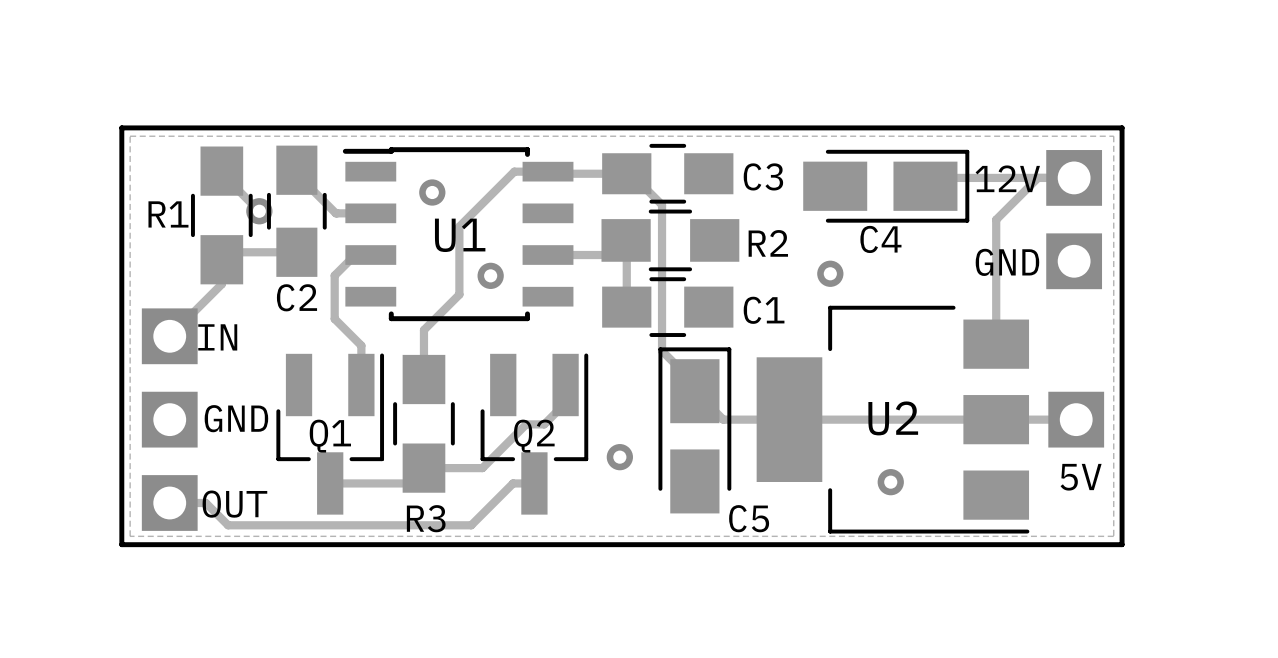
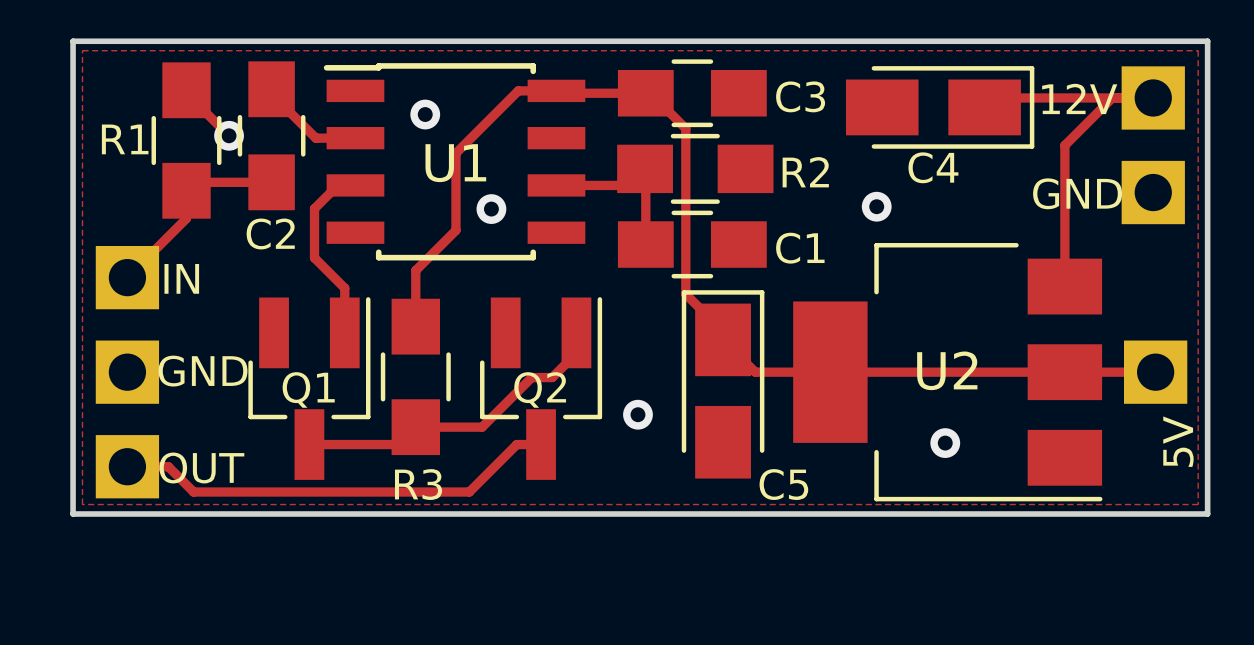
text rotation: 0° (1081, 477) -> 90° counterclockwise (1178, 441)

